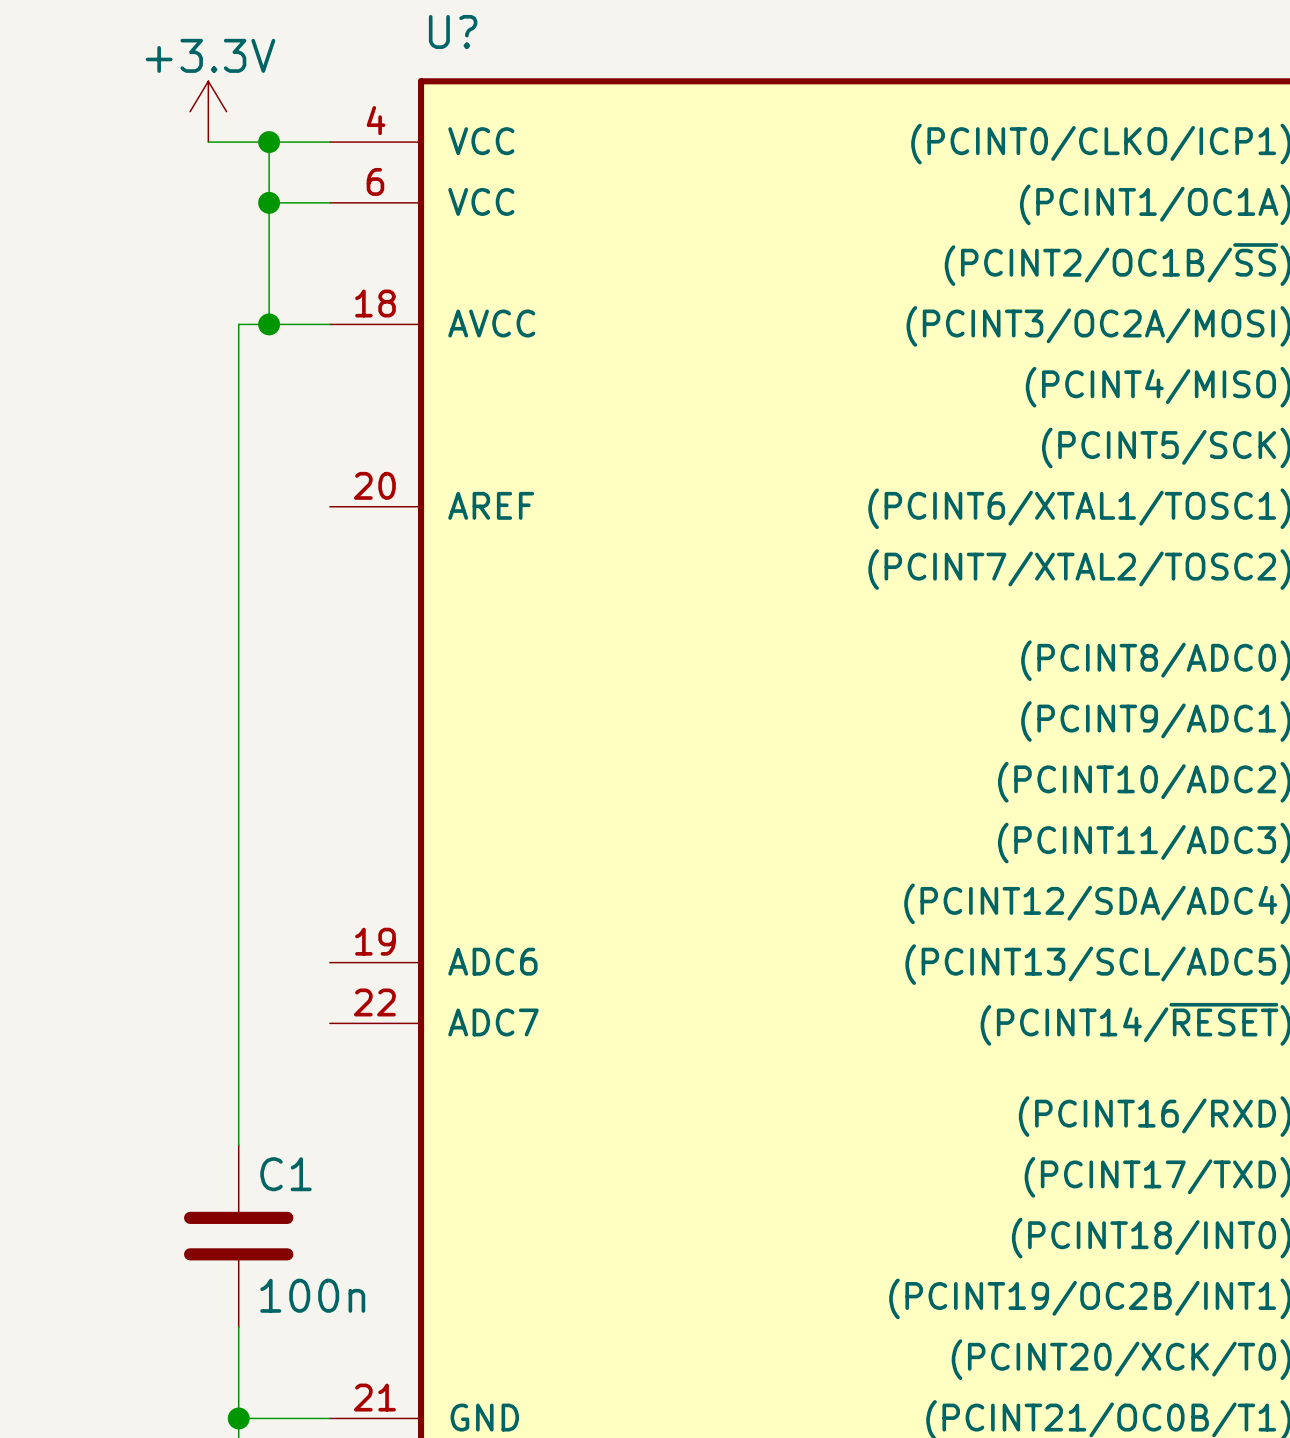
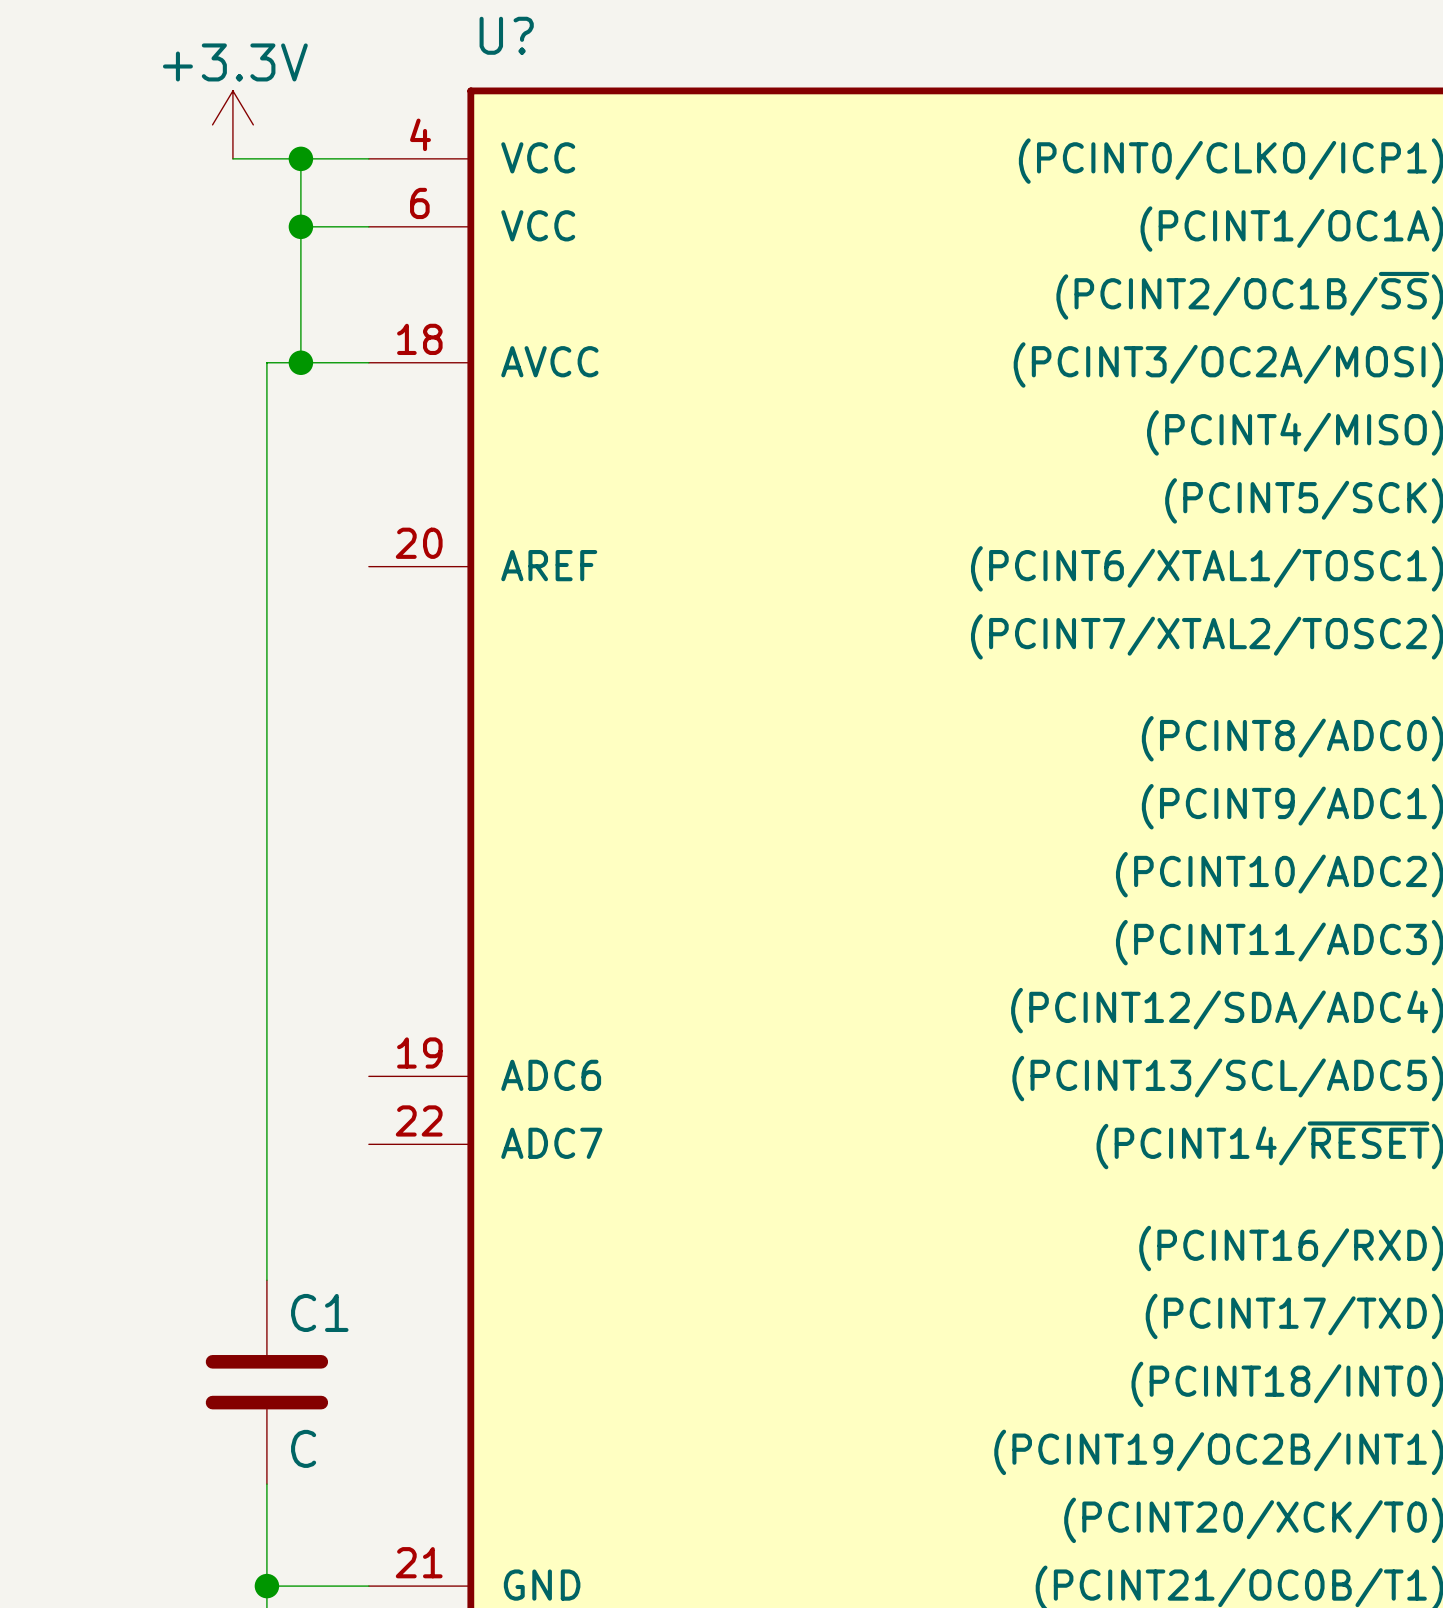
C1 value: 100n (312, 1295) -> C (303, 1448)

